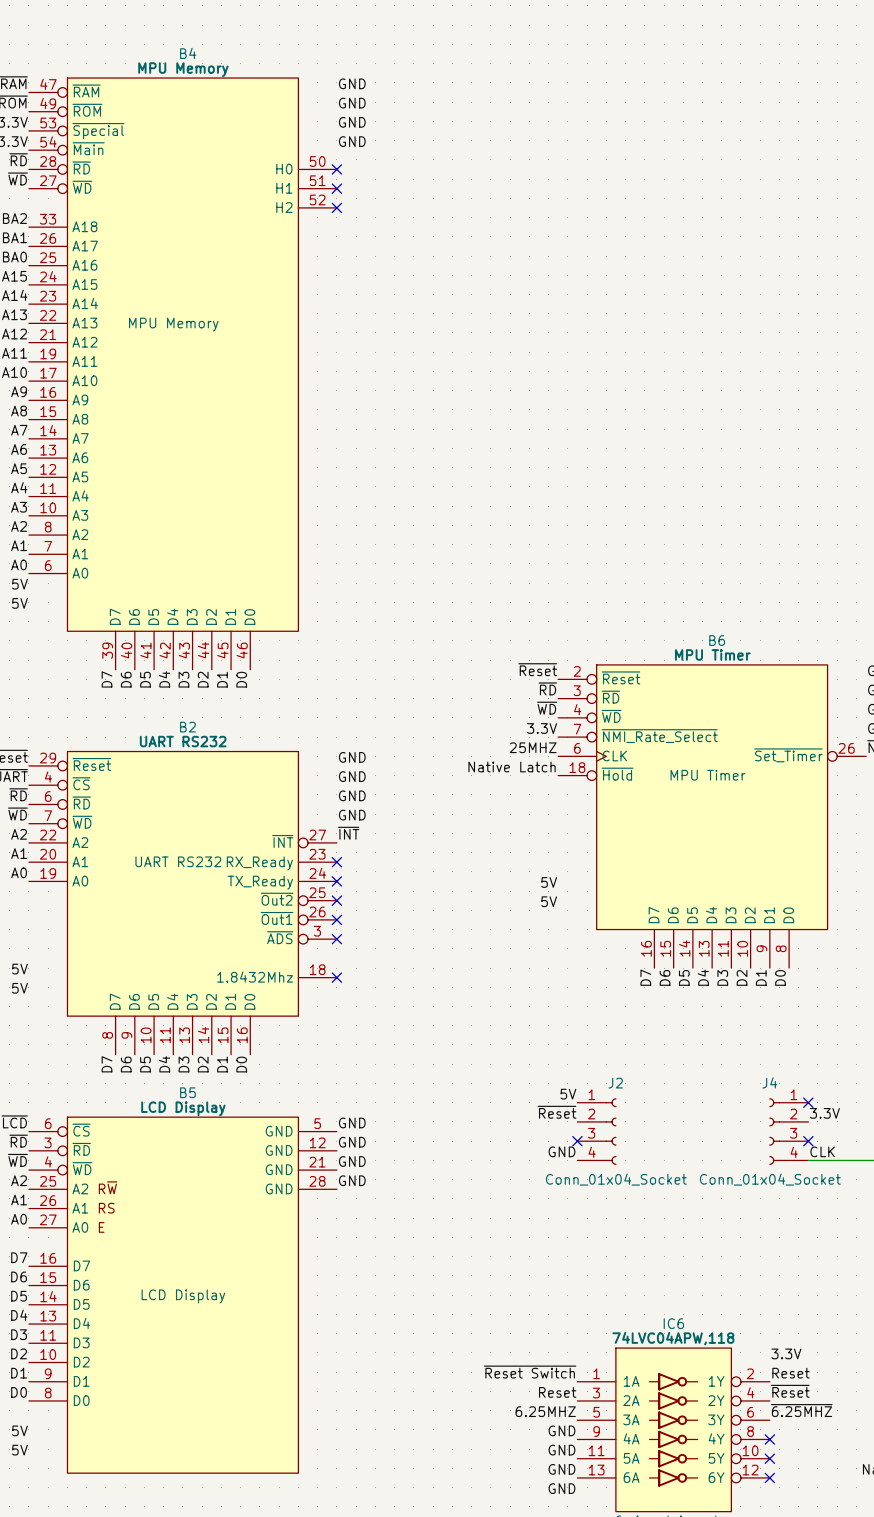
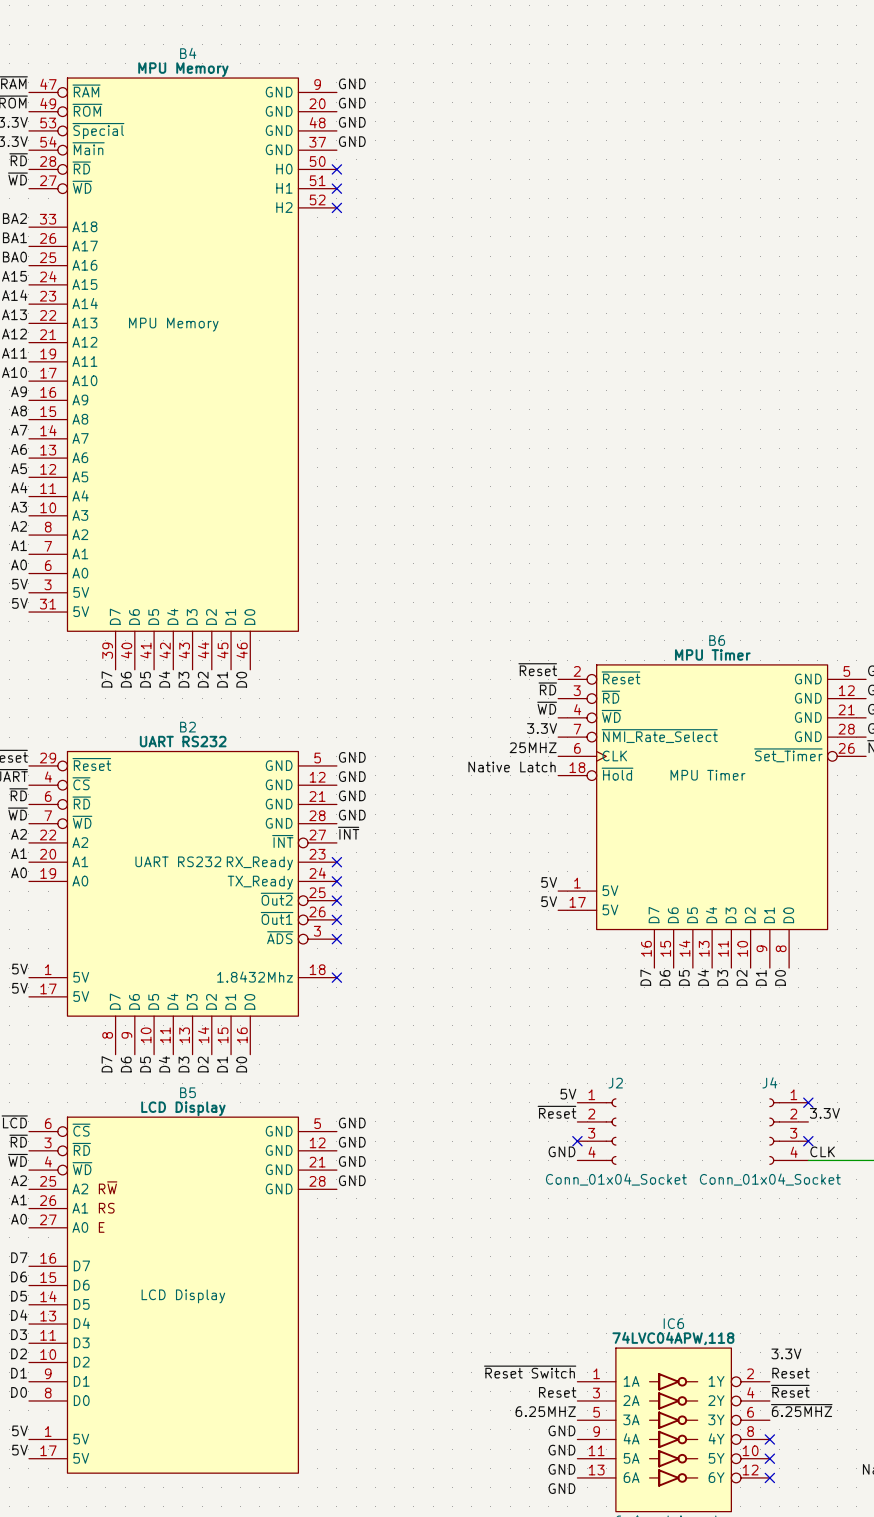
B4 symbol: [28, 77, 337, 670] -> [28, 77, 337, 670]
B6 symbol: [558, 664, 867, 969] -> [558, 664, 867, 969]
B2 symbol: [28, 750, 337, 1055] -> [28, 750, 337, 1055]
B5 symbol: [28, 1116, 337, 1474] -> [28, 1116, 337, 1474]

